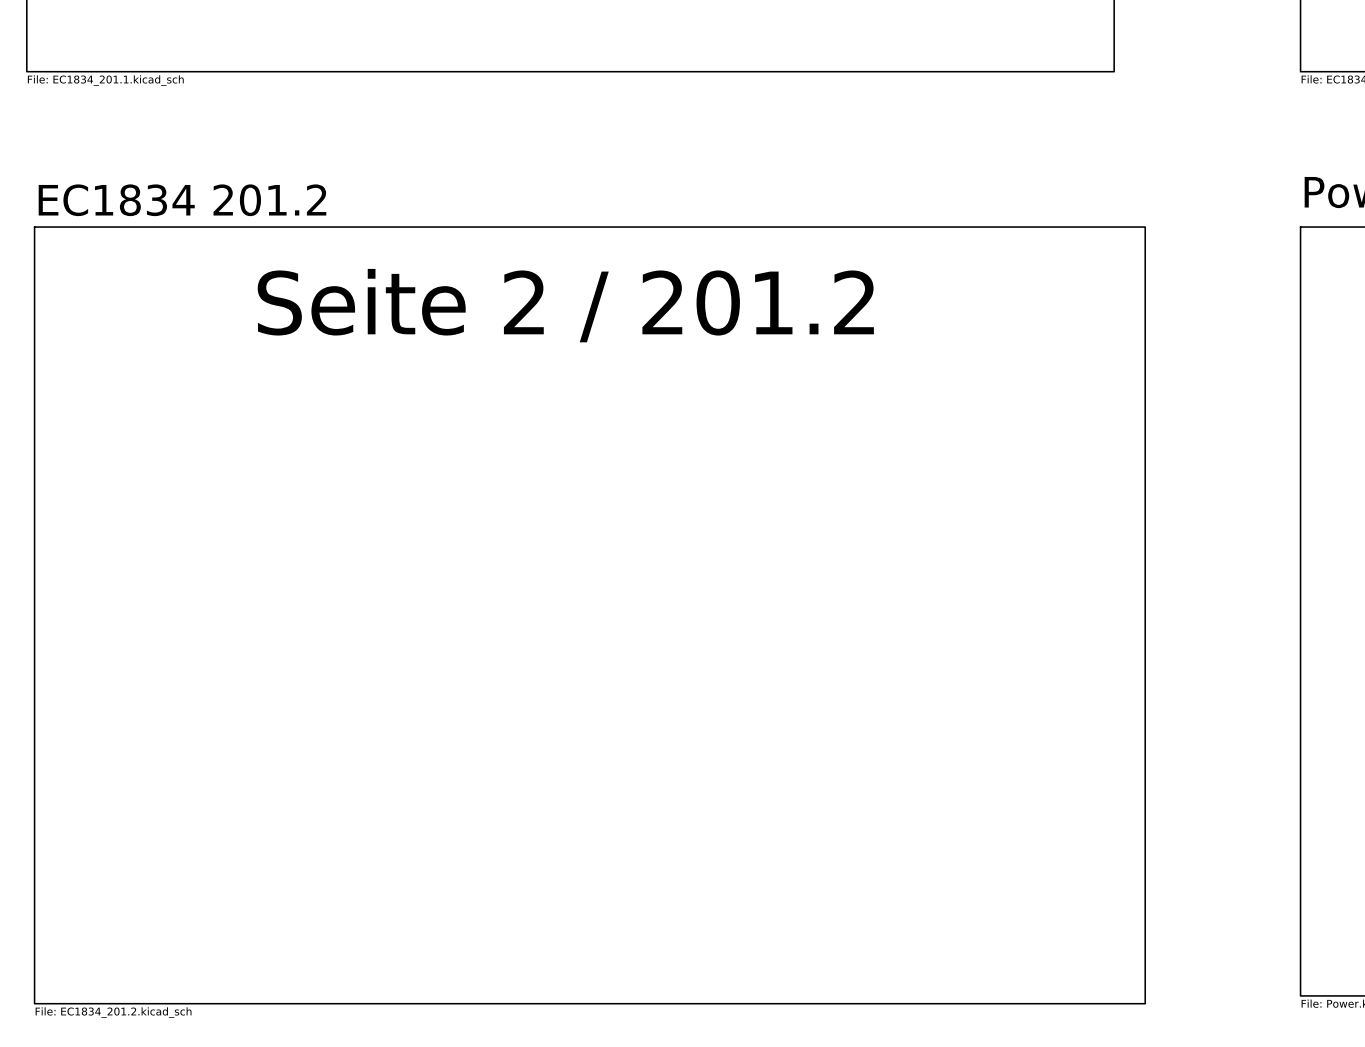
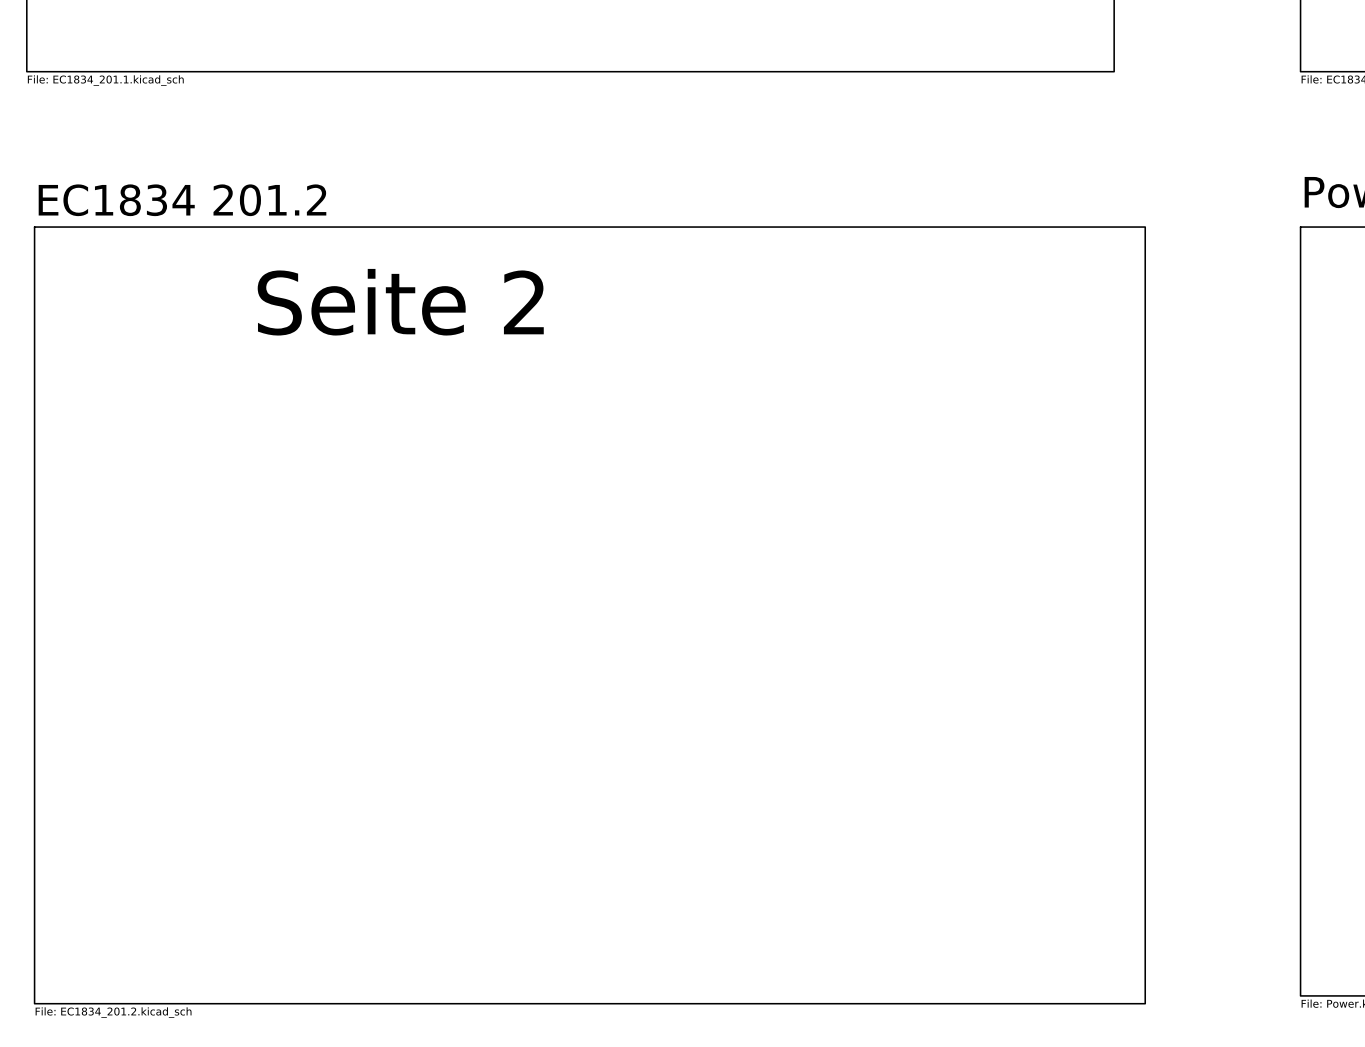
text: Seite 2 / 201.2 (565, 305) -> Seite 2 (400, 302)

